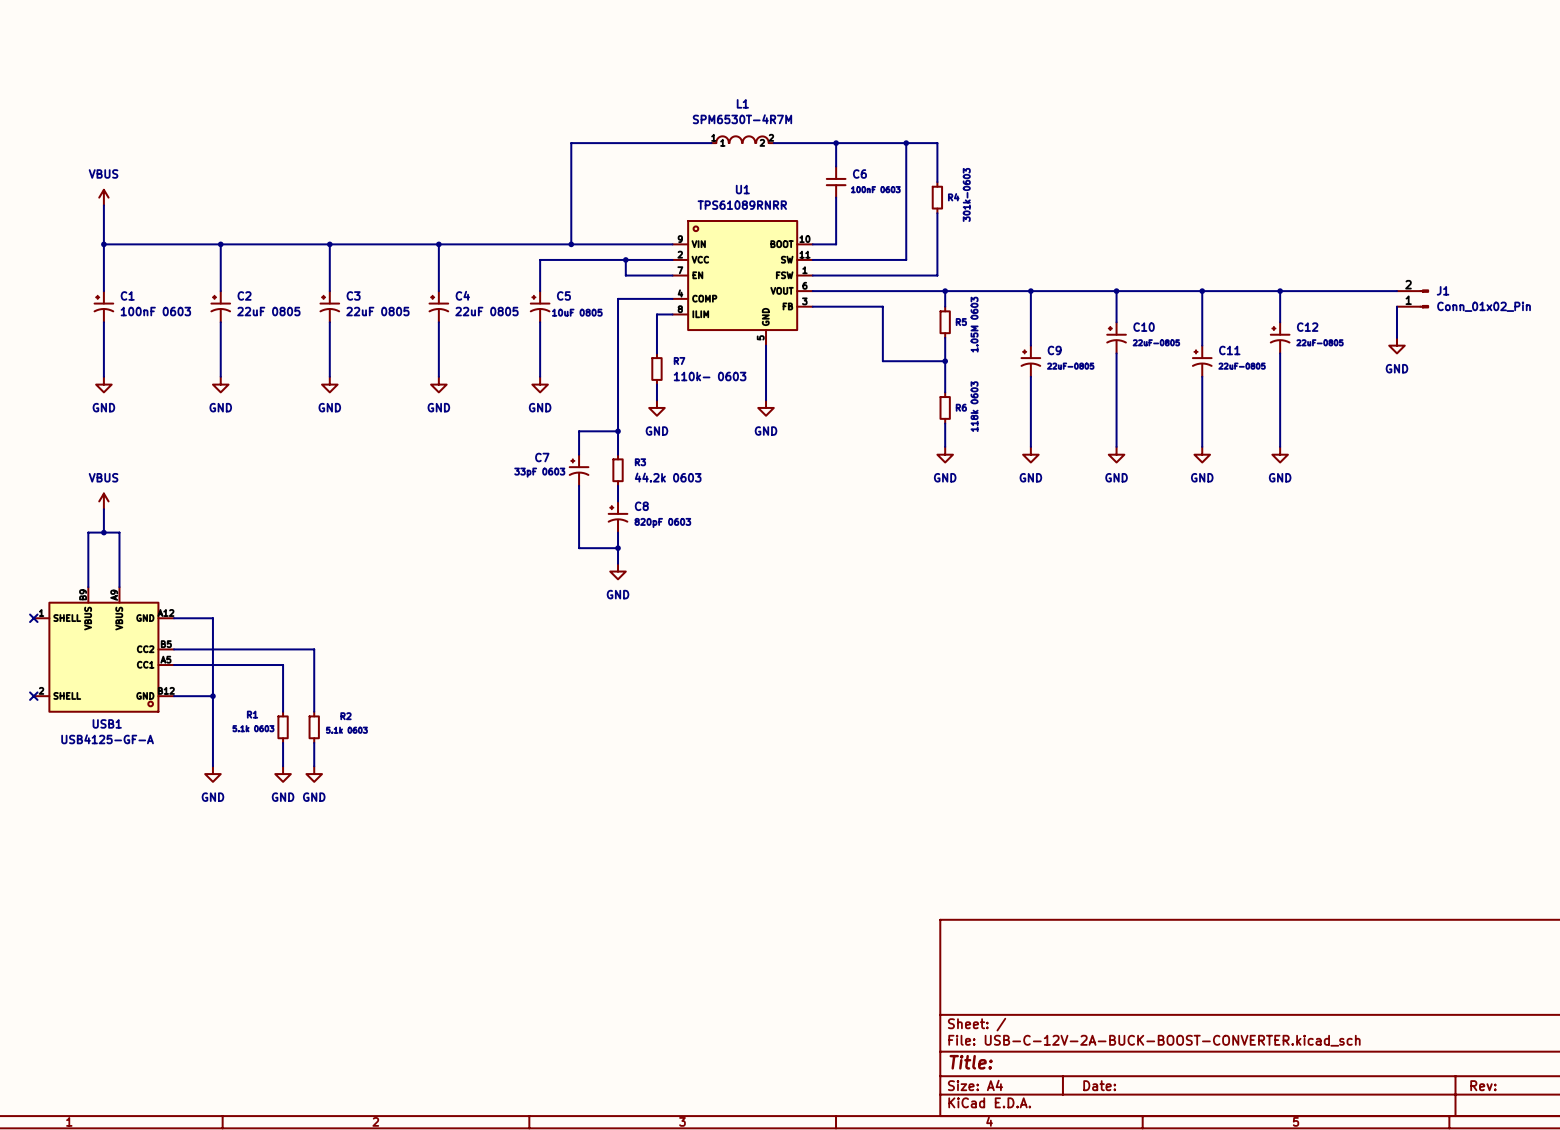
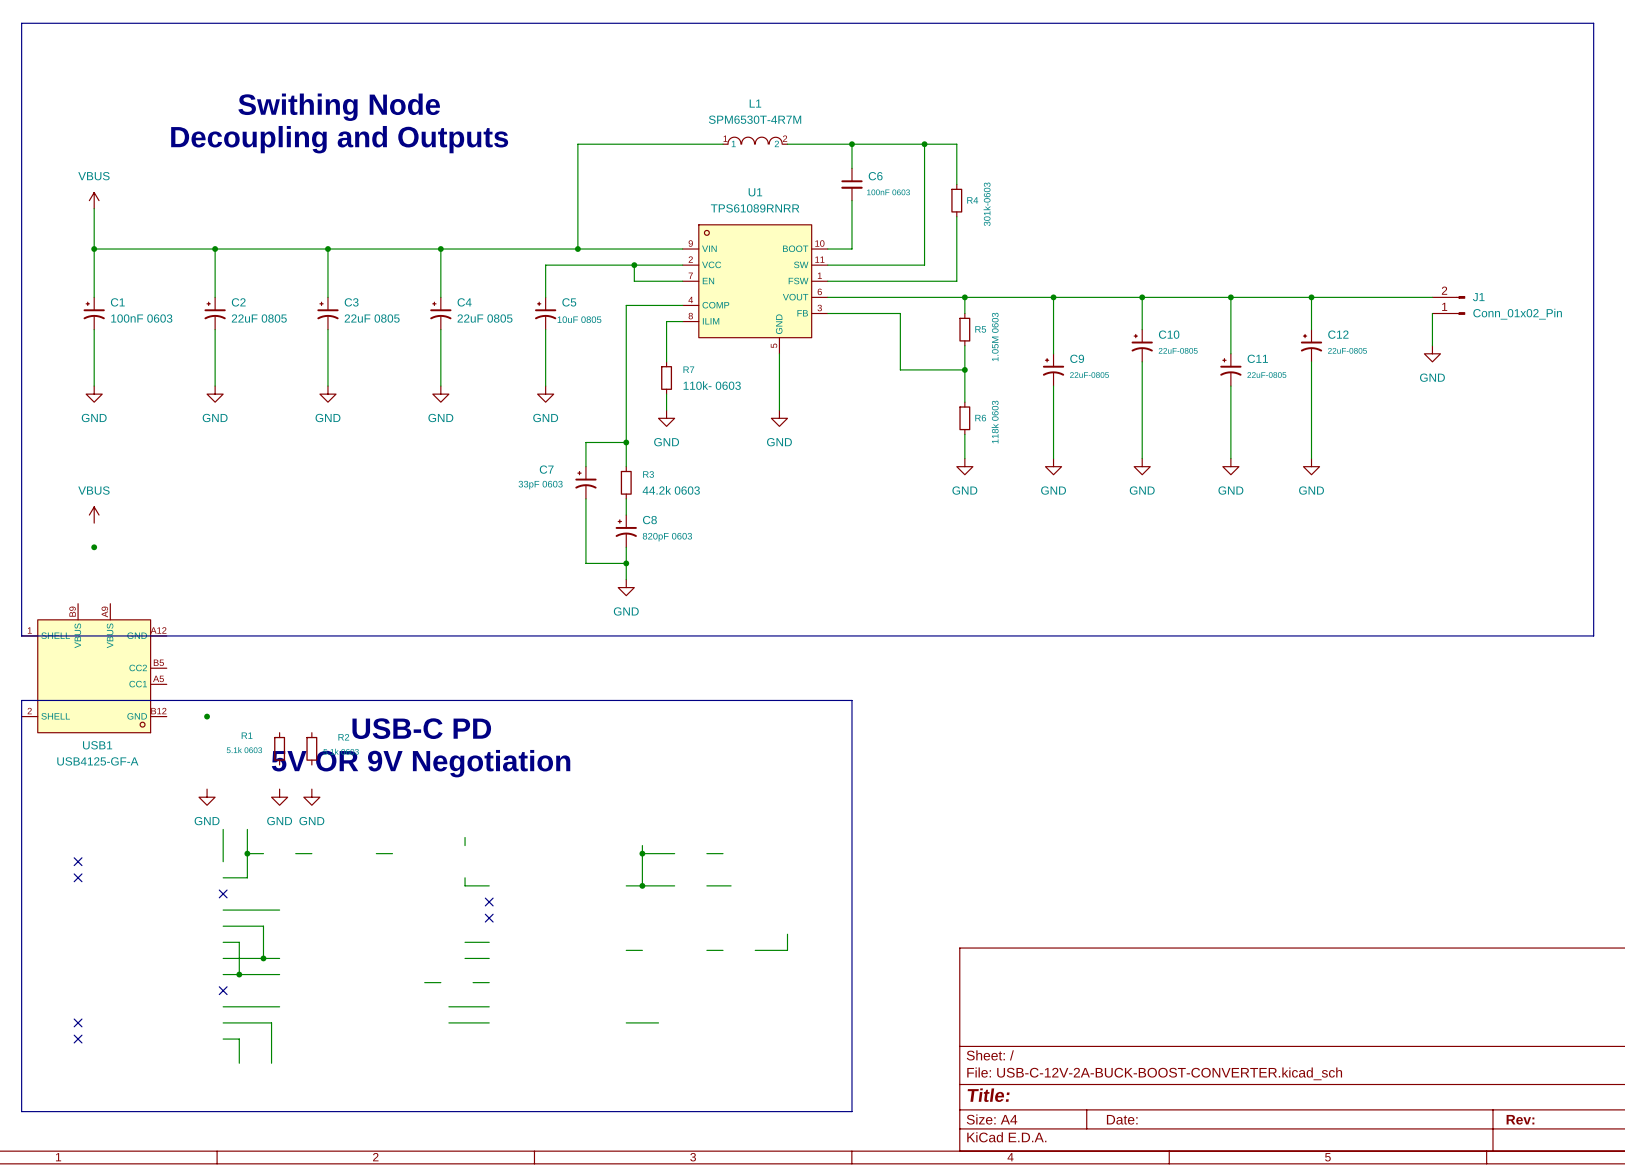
bus: none -> (21, 23) (1593, 23) (1593, 635) (21, 635) (21, 23)
text: none -> Swithing Node (339, 107)
text: none -> Decoupling and Outputs (339, 139)
wire: (103, 509) (103, 532) -> none
wire: (88, 587) (88, 532) (119, 532) (119, 587) -> none
no-connect mark: (33, 618) -> none
wire: (174, 618) (212, 618) (212, 766) -> none
wire: (174, 649) (314, 649) (314, 711) -> none
wire: (174, 665) (283, 665) (283, 711) -> none
bus: none -> (21, 700) (851, 700) (851, 1111) (21, 1111) (21, 700)
no-connect mark: (33, 696) -> none
wire: (174, 696) (212, 696) -> none
text: none -> USB-C PD (421, 728)
wire: (283, 742) (283, 766) -> none
wire: (314, 742) (314, 766) -> none
text: none -> 5V OR 9V Negotiation (421, 763)
wire: none -> (223, 829) (223, 861)
wire: none -> (247, 829) (247, 877) (223, 877)
wire: none -> (465, 837) (465, 845)
wire: none -> (642, 845) (642, 885)
wire: none -> (247, 853) (263, 853)
junction: none -> (247, 853)
wire: none -> (295, 853) (311, 853)
wire: none -> (376, 853) (392, 853)
wire: none -> (642, 853) (674, 853)
junction: none -> (642, 853)
wire: none -> (706, 853) (723, 853)
no-connect mark: none -> (78, 861)
no-connect mark: none -> (78, 877)
wire: none -> (465, 877) (465, 885) (489, 885)
wire: none -> (626, 885) (674, 885)
junction: none -> (642, 885)
wire: none -> (706, 885) (731, 885)
no-connect mark: none -> (223, 893)
no-connect mark: none -> (489, 902)
wire: none -> (223, 910) (279, 910)
no-connect mark: none -> (489, 918)
wire: none -> (223, 926) (263, 926) (263, 958)
wire: none -> (787, 934) (787, 950) (755, 950)
wire: none -> (223, 942) (239, 942) (239, 974)
wire: none -> (465, 942) (489, 942)
wire: none -> (626, 950) (642, 950)
wire: none -> (706, 950) (723, 950)
wire: none -> (223, 958) (279, 958)
junction: none -> (263, 958)
wire: none -> (465, 958) (489, 958)
wire: none -> (223, 974) (279, 974)
junction: none -> (239, 974)
wire: none -> (424, 982) (440, 982)
wire: none -> (473, 982) (489, 982)
no-connect mark: none -> (223, 990)
wire: none -> (223, 1006) (279, 1006)
wire: none -> (448, 1006) (489, 1006)
no-connect mark: none -> (78, 1022)
wire: none -> (223, 1022) (271, 1022) (271, 1063)
wire: none -> (448, 1022) (489, 1022)
wire: none -> (626, 1022) (658, 1022)
no-connect mark: none -> (78, 1039)
wire: none -> (223, 1039) (239, 1039) (239, 1063)

